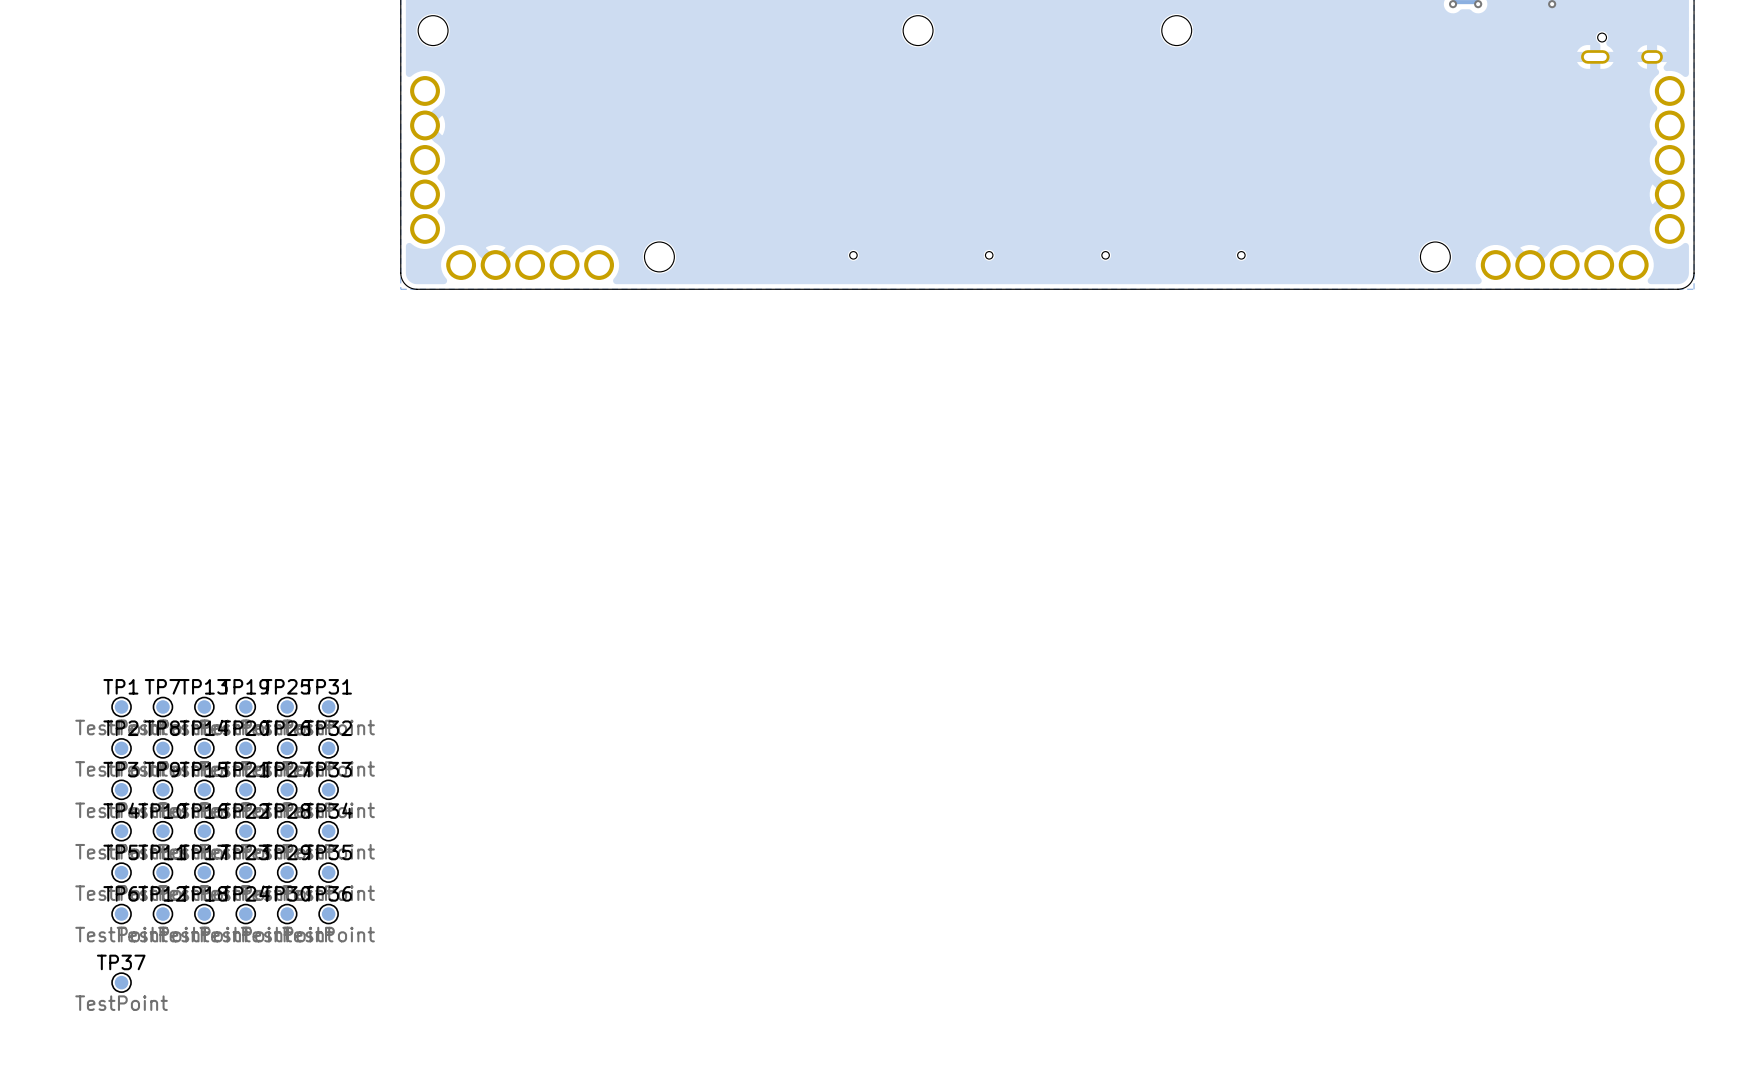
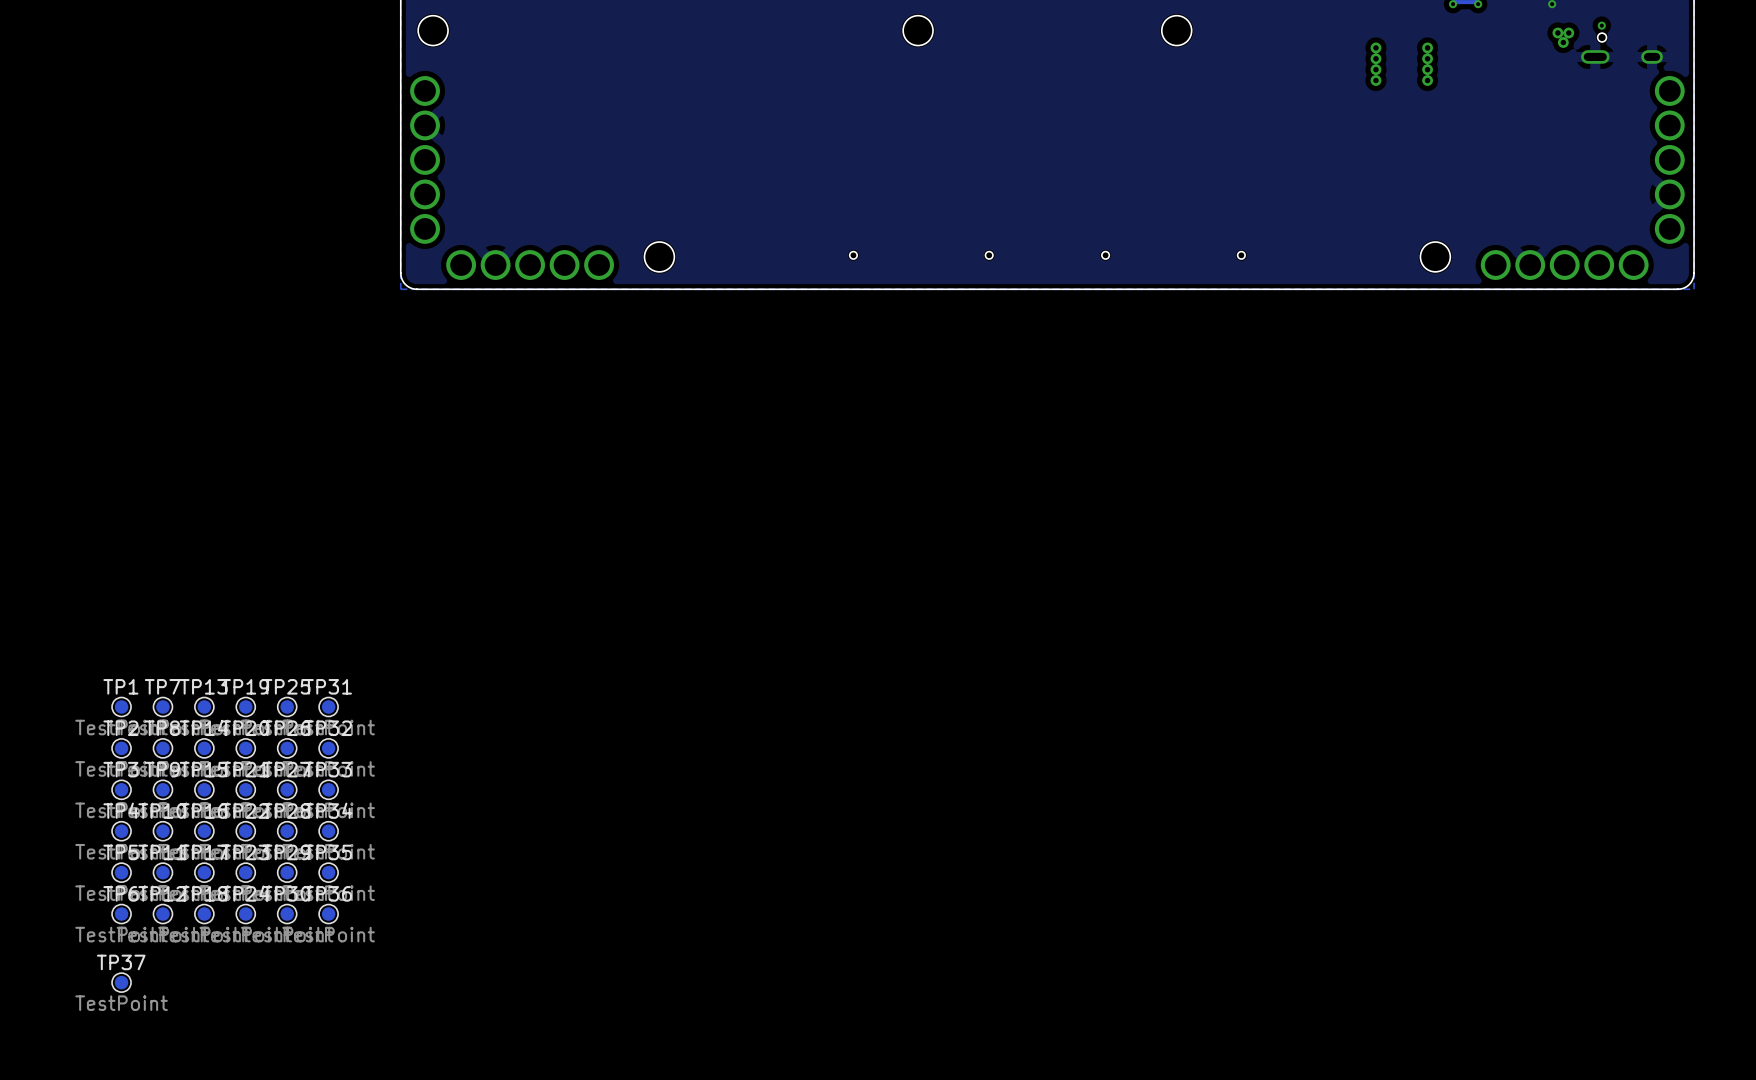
via: none -> (1601, 25)
via: none -> (1557, 33)
via: none -> (1568, 33)
via: none -> (1563, 42)
via: none -> (1375, 47)
via: none -> (1427, 47)
via: none -> (1375, 58)
via: none -> (1427, 58)
via: none -> (1375, 69)
via: none -> (1427, 69)
via: none -> (1375, 80)
via: none -> (1427, 80)

